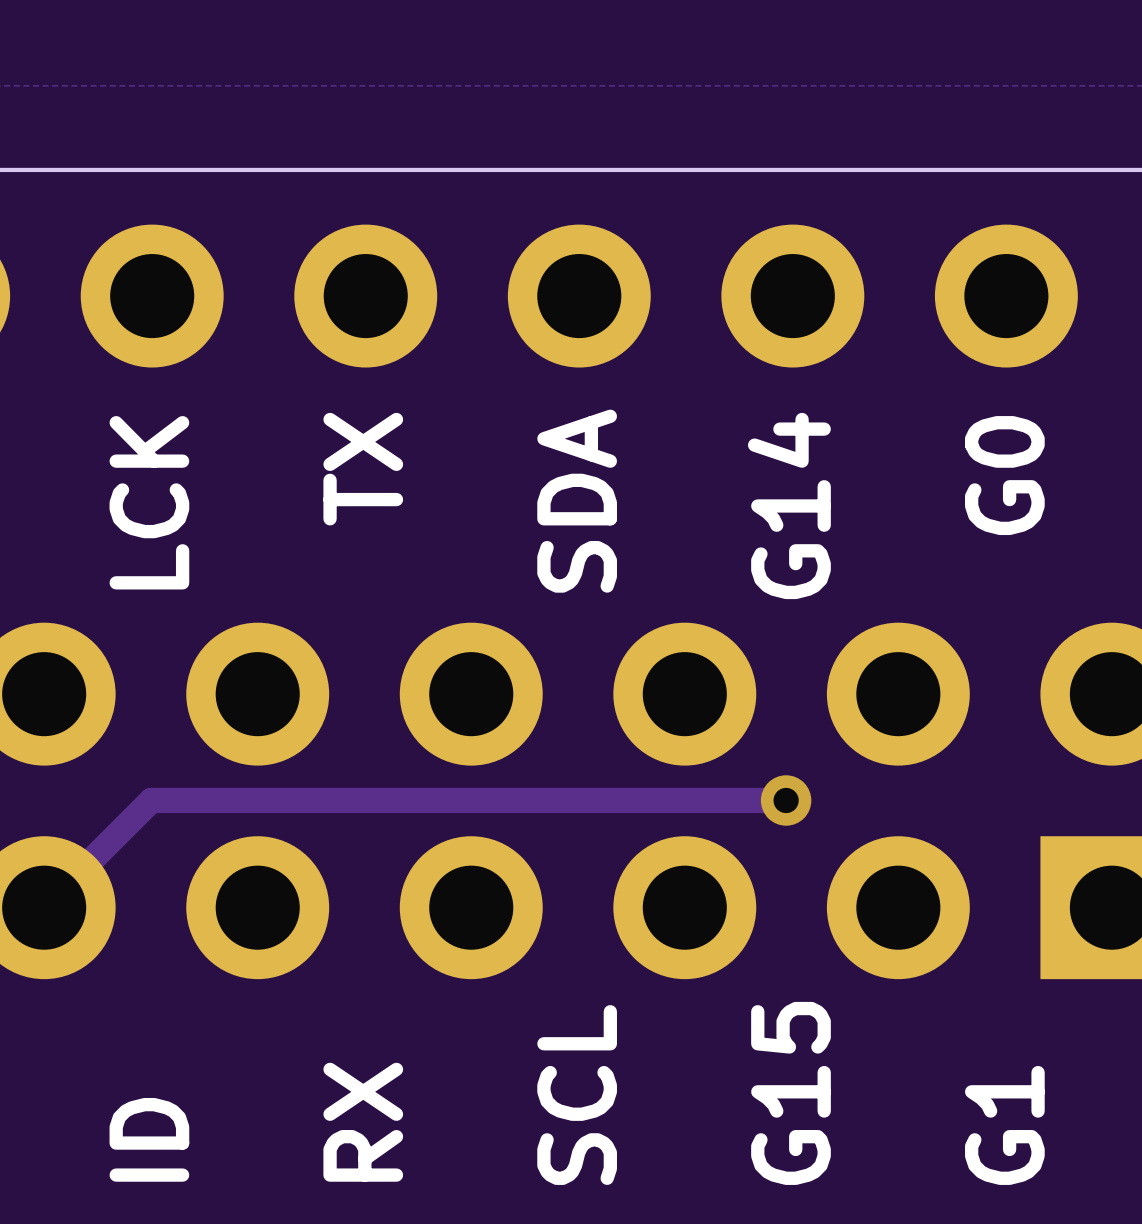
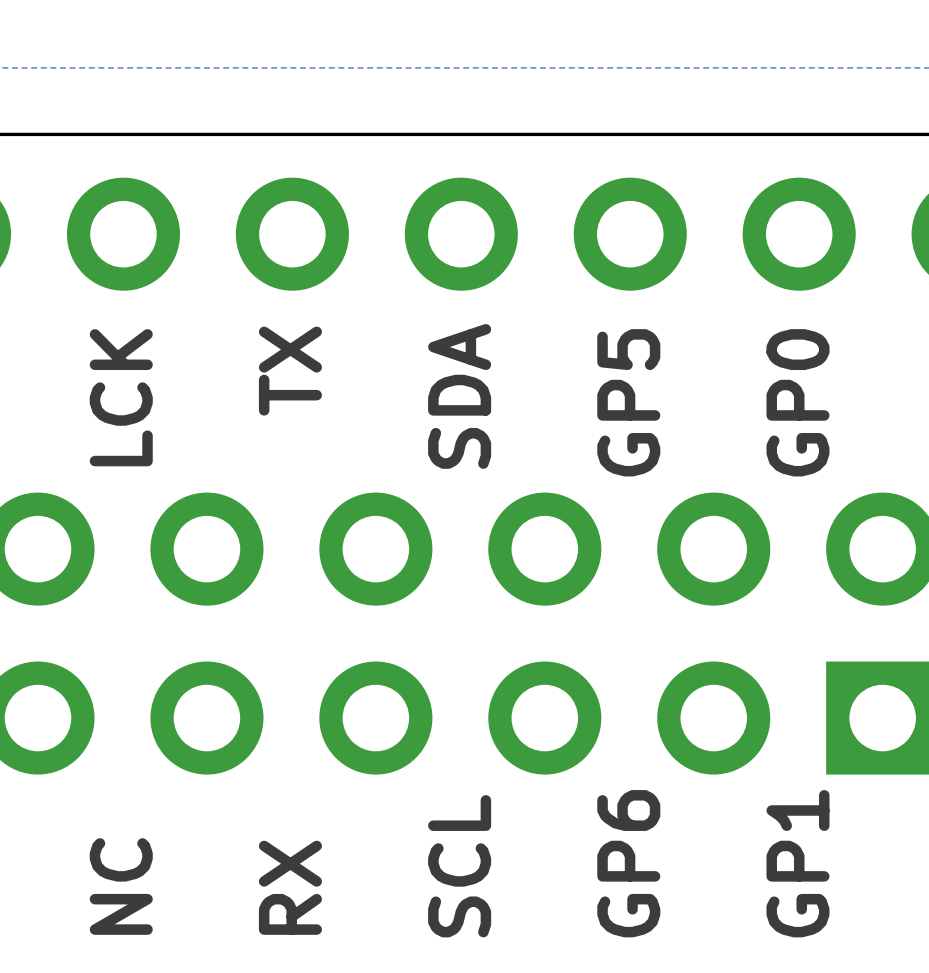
text: G0 (1004, 475) -> GP0 (797, 402)
text: G14 (789, 505) -> GP5 (628, 402)
track: (786, 800) (151, 800) (44, 907) -> none
via: (786, 800) -> none
text: G15 (790, 1093) -> GP6 (628, 863)
text: G1 (1004, 1125) -> GP1 (797, 863)
text: ID (149, 1139) -> NC (121, 886)

